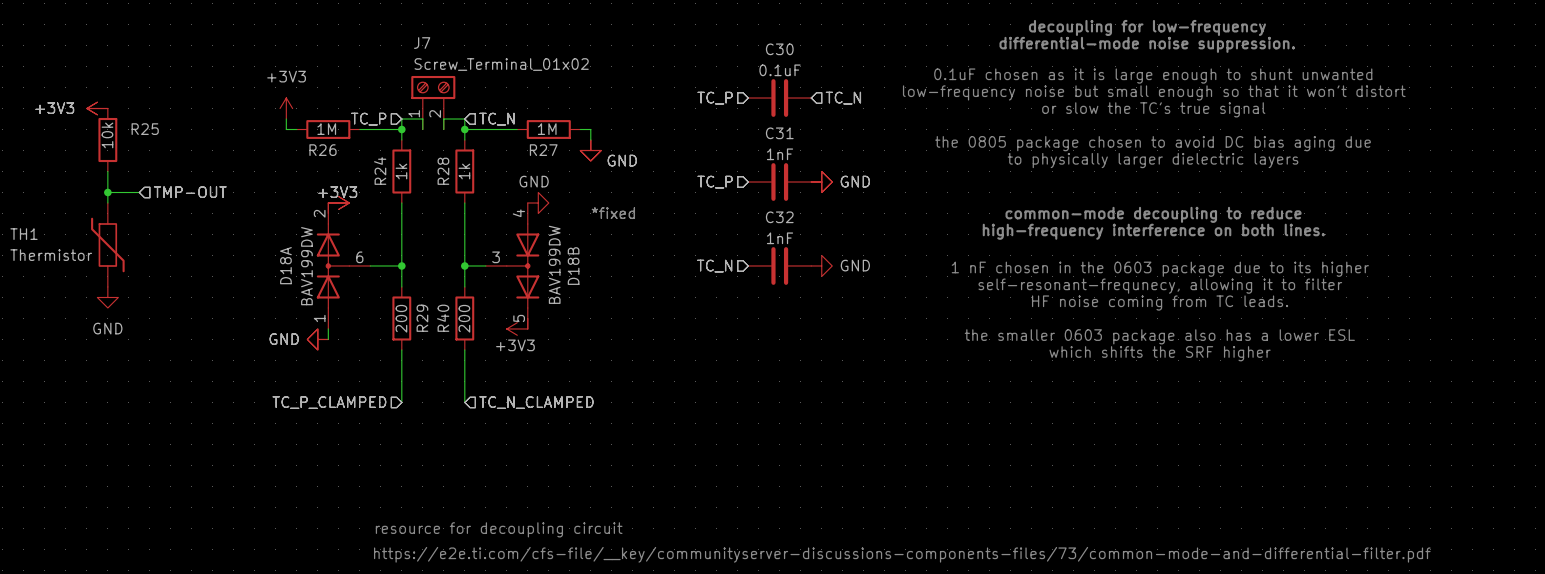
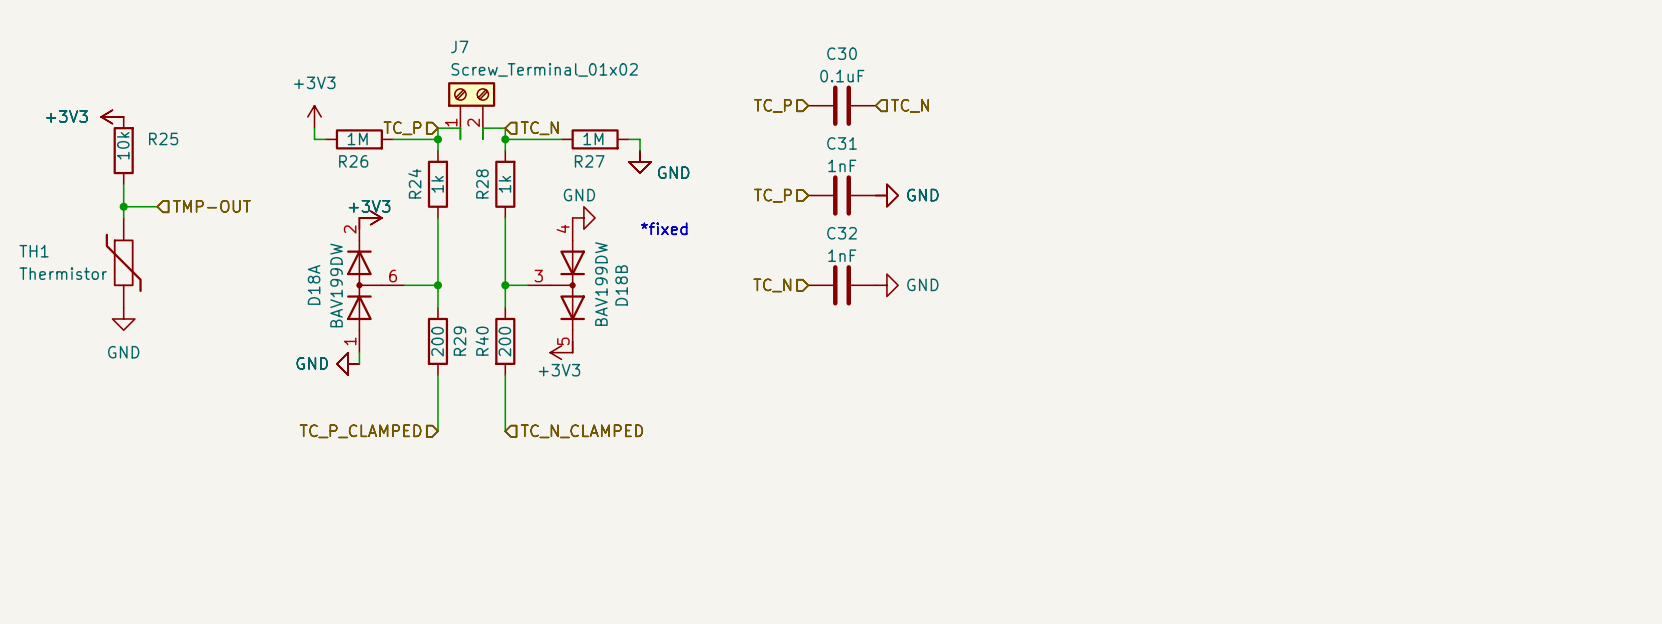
text: decoupling for low-frequency (1147, 27) -> none
text: differential-mode noise suppression. (1147, 44) -> none
text: 0.1uF chosen as it is large enough to shunt unwanted (1153, 76) -> none
text: low-frequency noise but small enough so that it won't distort (1154, 92) -> none
text: or slow the TC's true signal (1153, 109) -> none
text: the 0805 package chosen to avoid DC bias aging due (1153, 143) -> none
text: to physically larger dielectric layers (1153, 160) -> none
text: common-mode decoupling to reduce (1153, 214) -> none
text: high-frequency interference on both lines. (1153, 231) -> none
text: 1 nF chosen in the 0603 package due to its higher (1160, 269) -> none
text: self-resonant-frequnecy, allowing it to filter (1160, 286) -> none
text: HF noise coming from TC leads. (1160, 303) -> none
text: the smaller 0603 package also has a lower ESL (1159, 336) -> none
text: which shifts the SRF higher (1160, 353) -> none
text: resource for decoupling circuit (499, 529) -> none
text: https://e2e.ti.com/cfs-file/__key/communityserver-discussions-components-files/73/common-mode-and-differential-filter.pdf (902, 554) -> none

